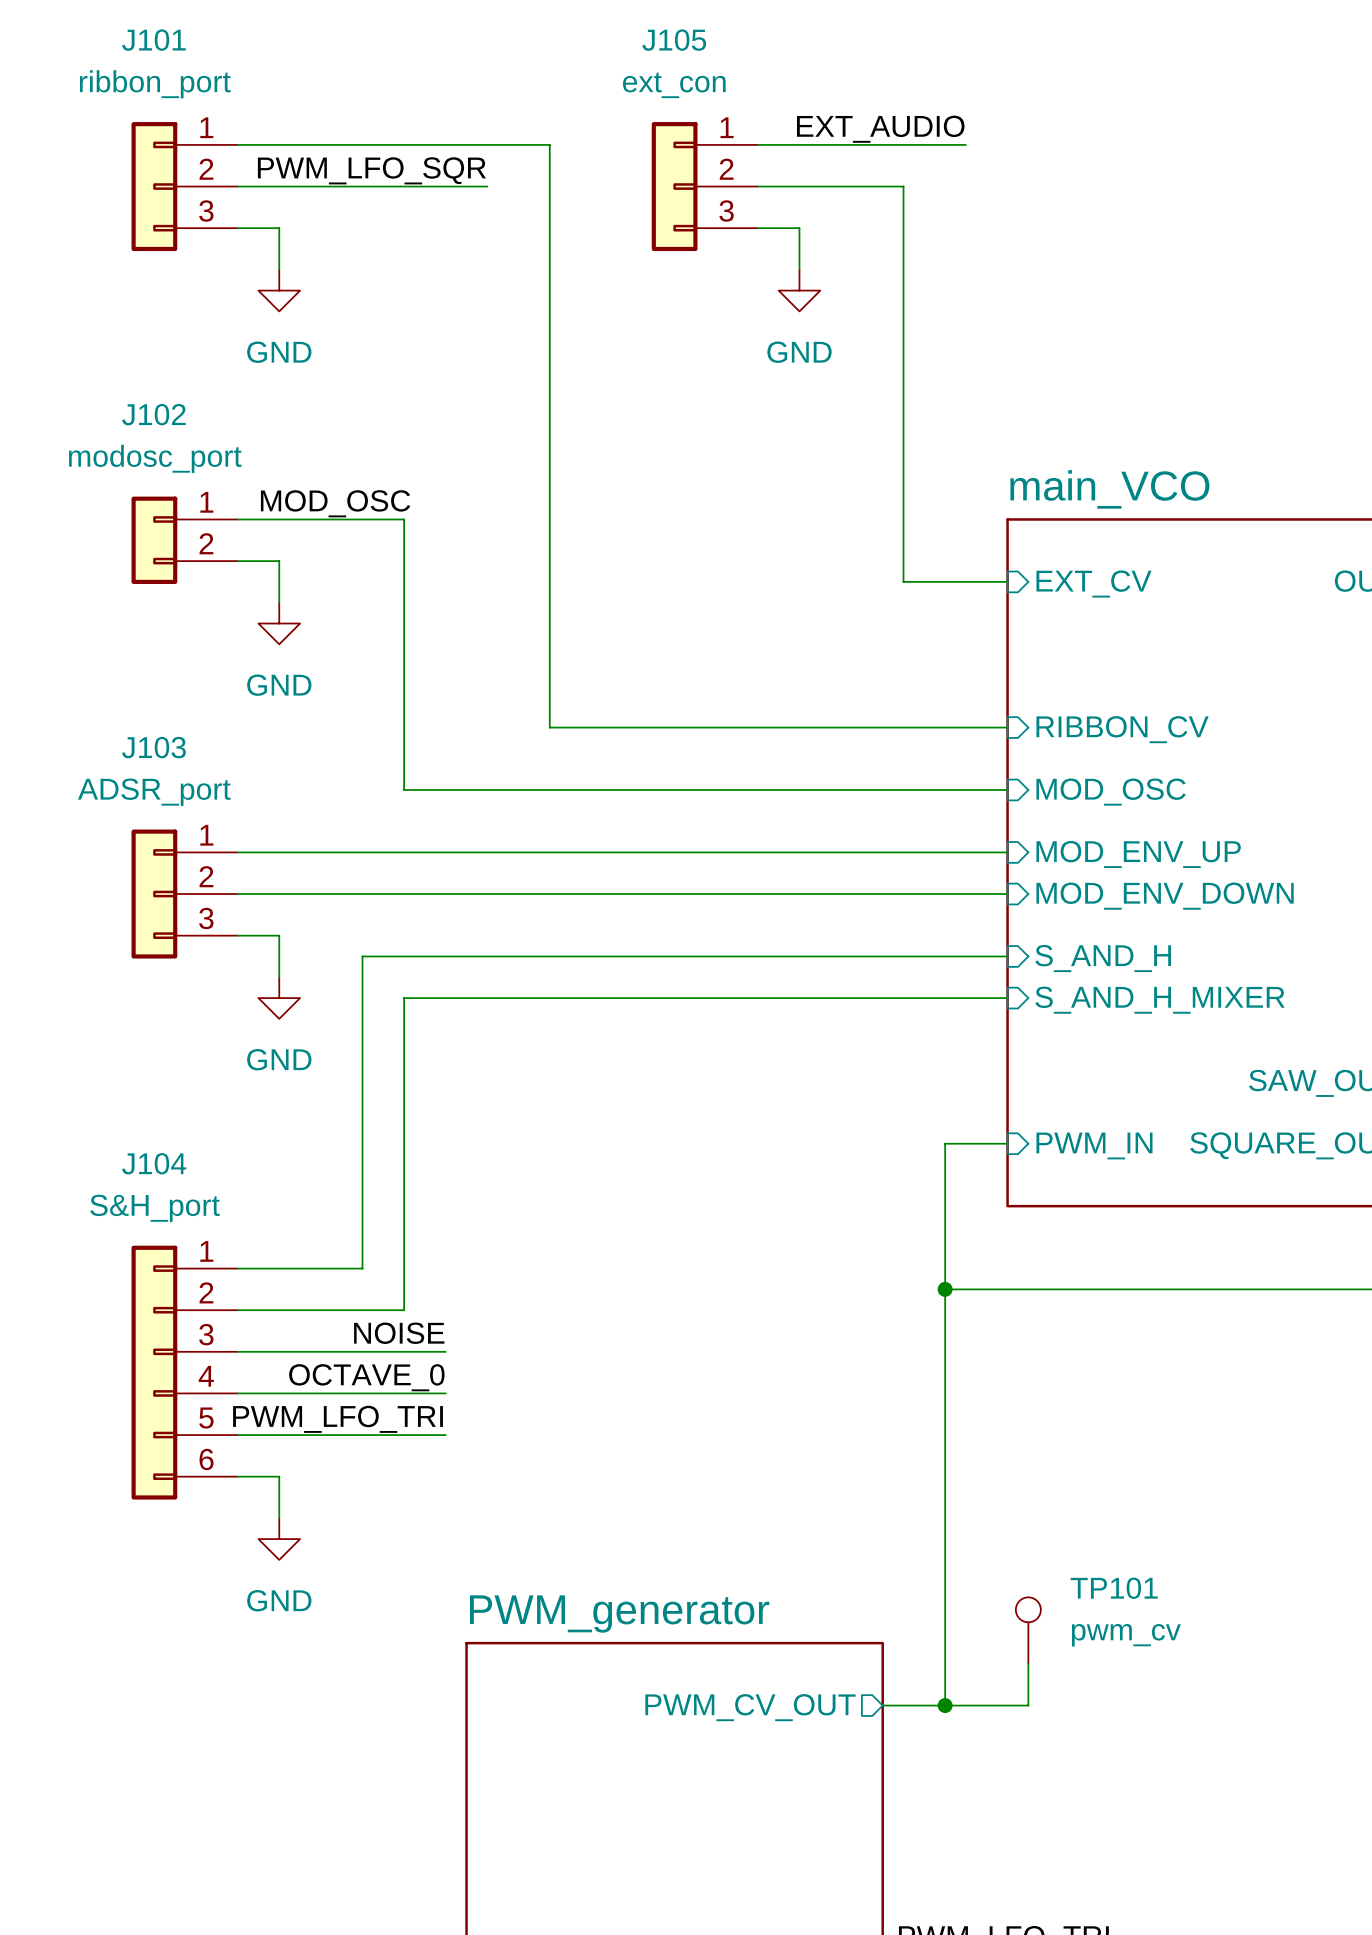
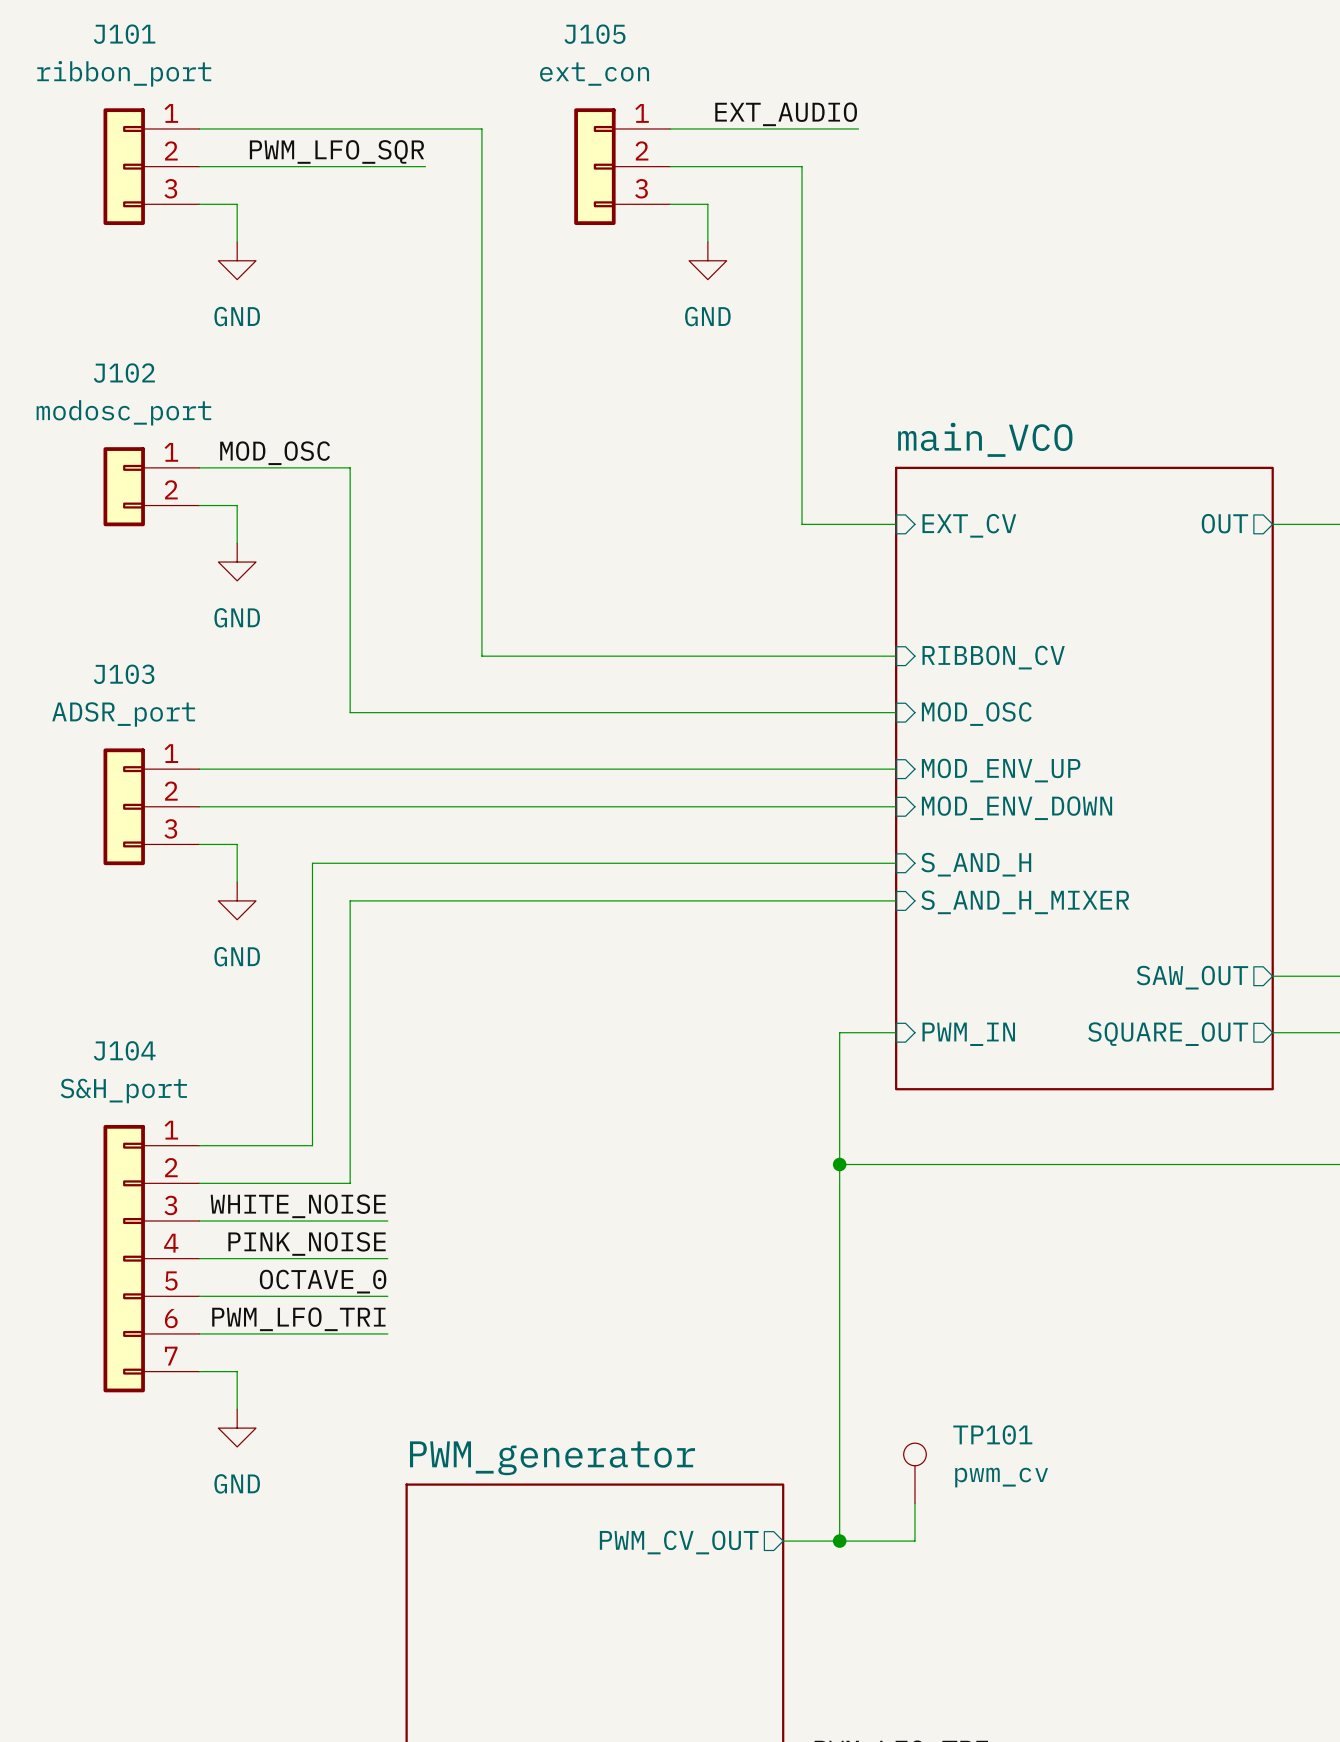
J104 symbol: [131, 1245, 238, 1500] -> [103, 1124, 200, 1393]
label: NOISE (399, 1333) -> WHITE_NOISE (298, 1206)
label: OCTAVE_0 (366, 1377) -> PINK_NOISE (307, 1243)
label: PWM_LFO_TRI (338, 1419) -> OCTAVE_0 (323, 1281)
label: none -> PWM_LFO_TRI (298, 1319)
wire: (279, 1476) (279, 1518) -> (237, 1333) (387, 1333)
wire: none -> (199, 1371) (237, 1371) (237, 1409)
power symbol position: GND (279, 1539) -> GND (237, 1428)

